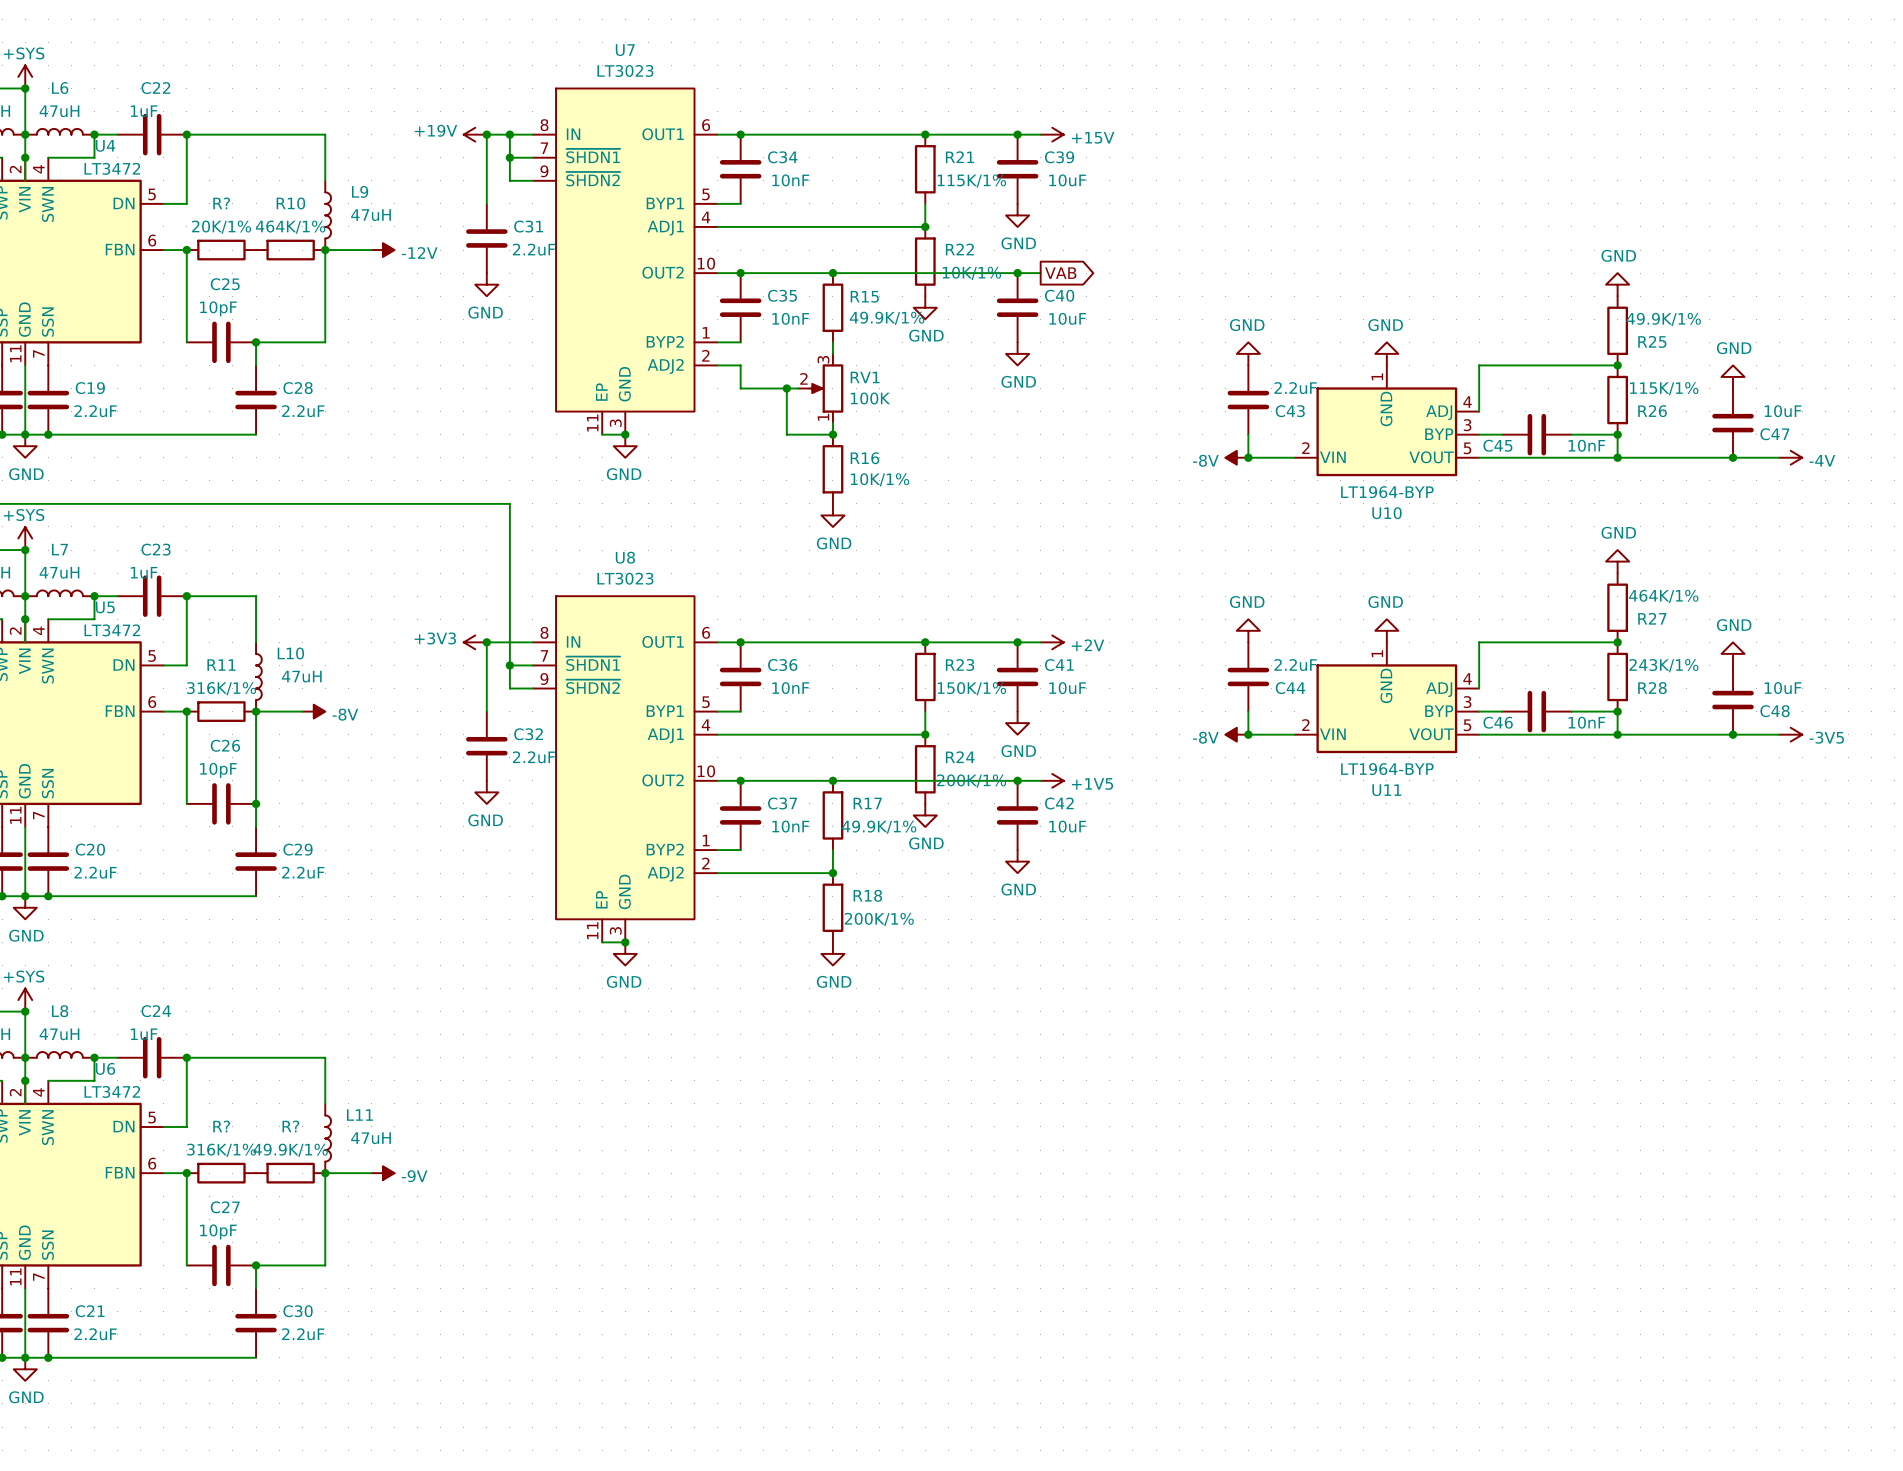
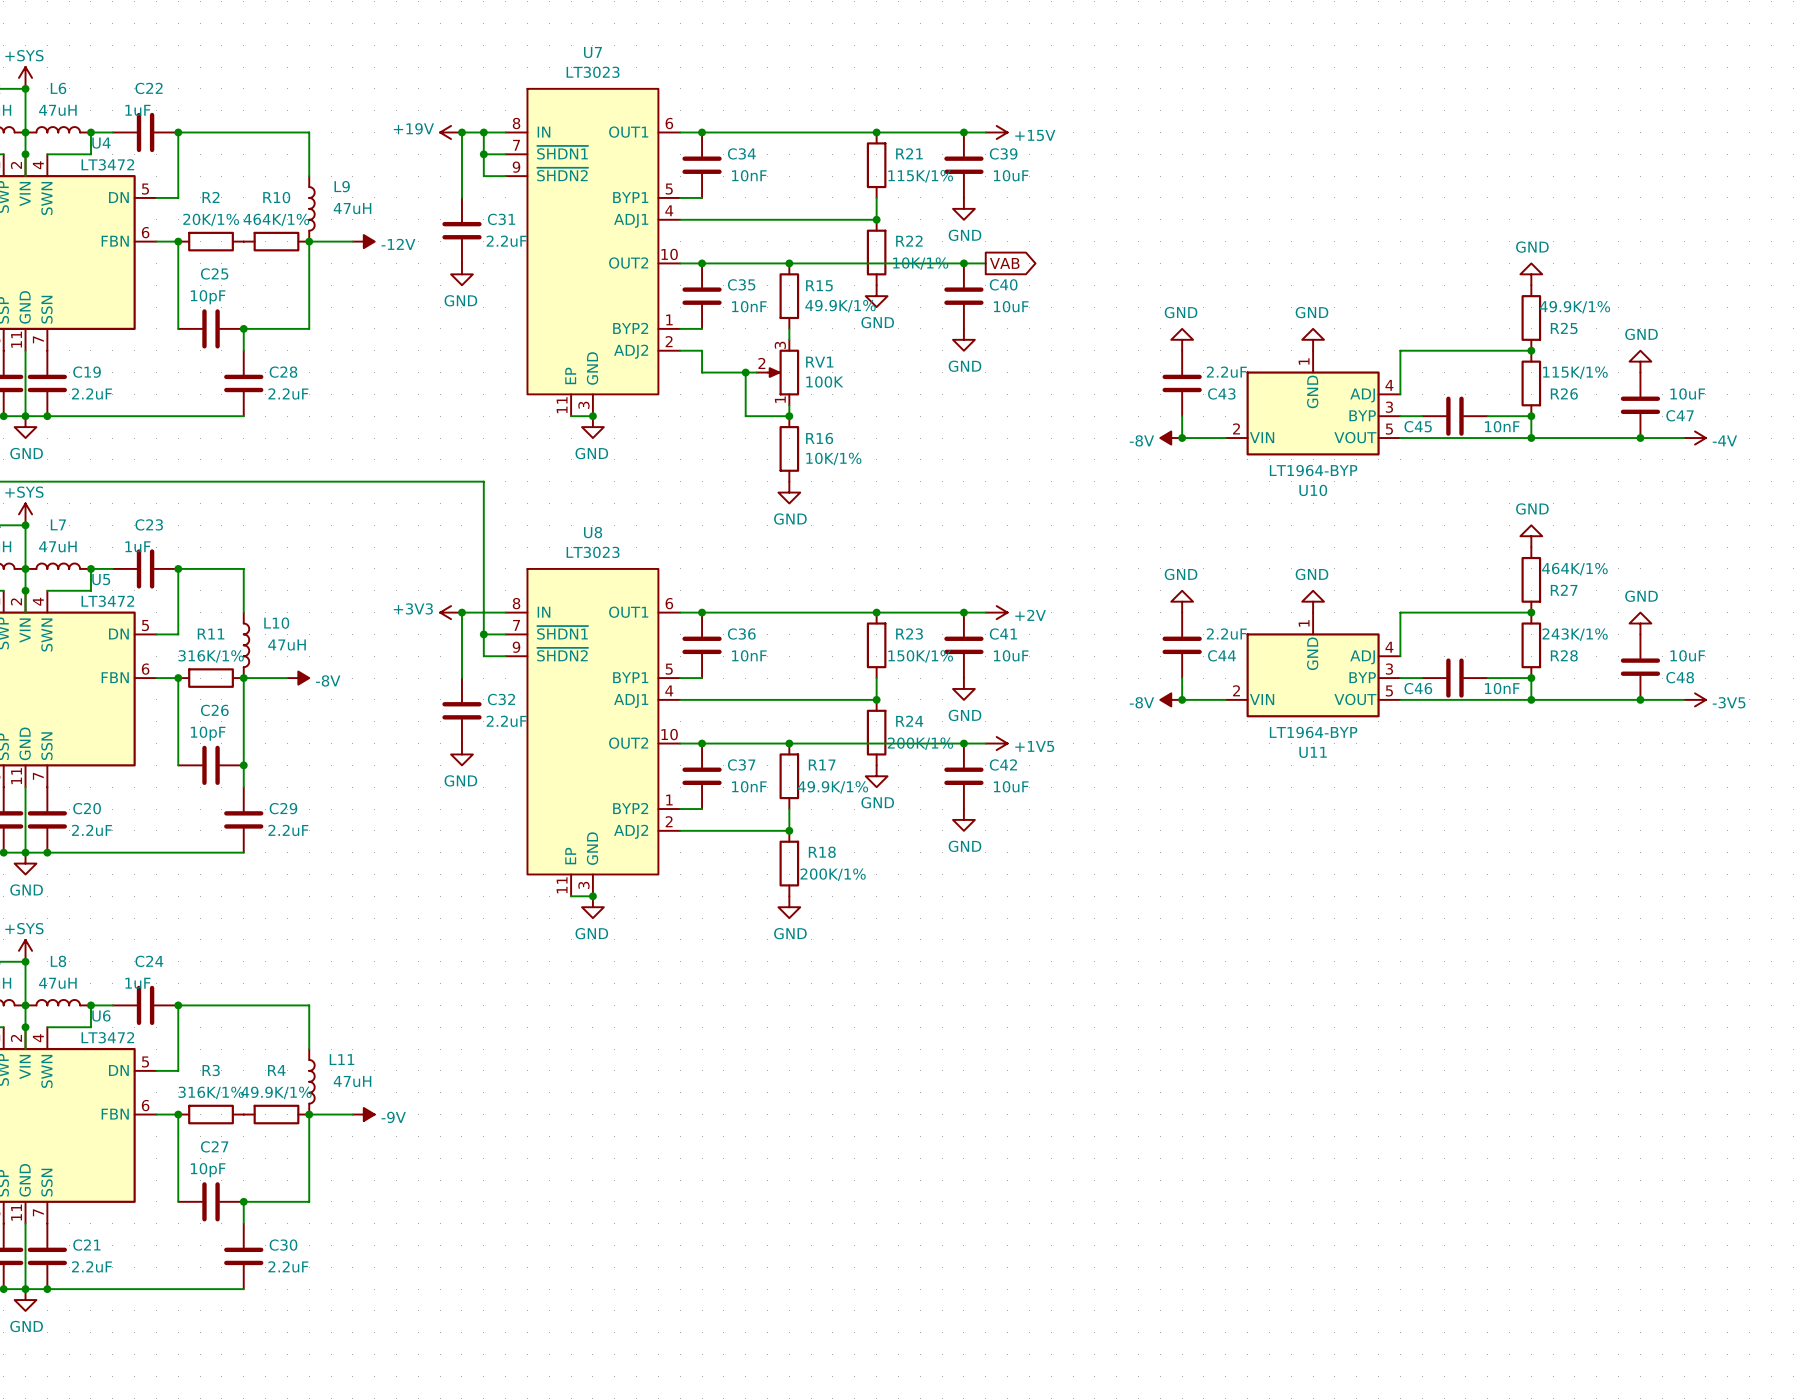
R? name: R? (221, 203) -> R2 (211, 197)
R? name: R? (221, 1126) -> R3 (211, 1070)
R? name: R? (290, 1126) -> R4 (276, 1070)

